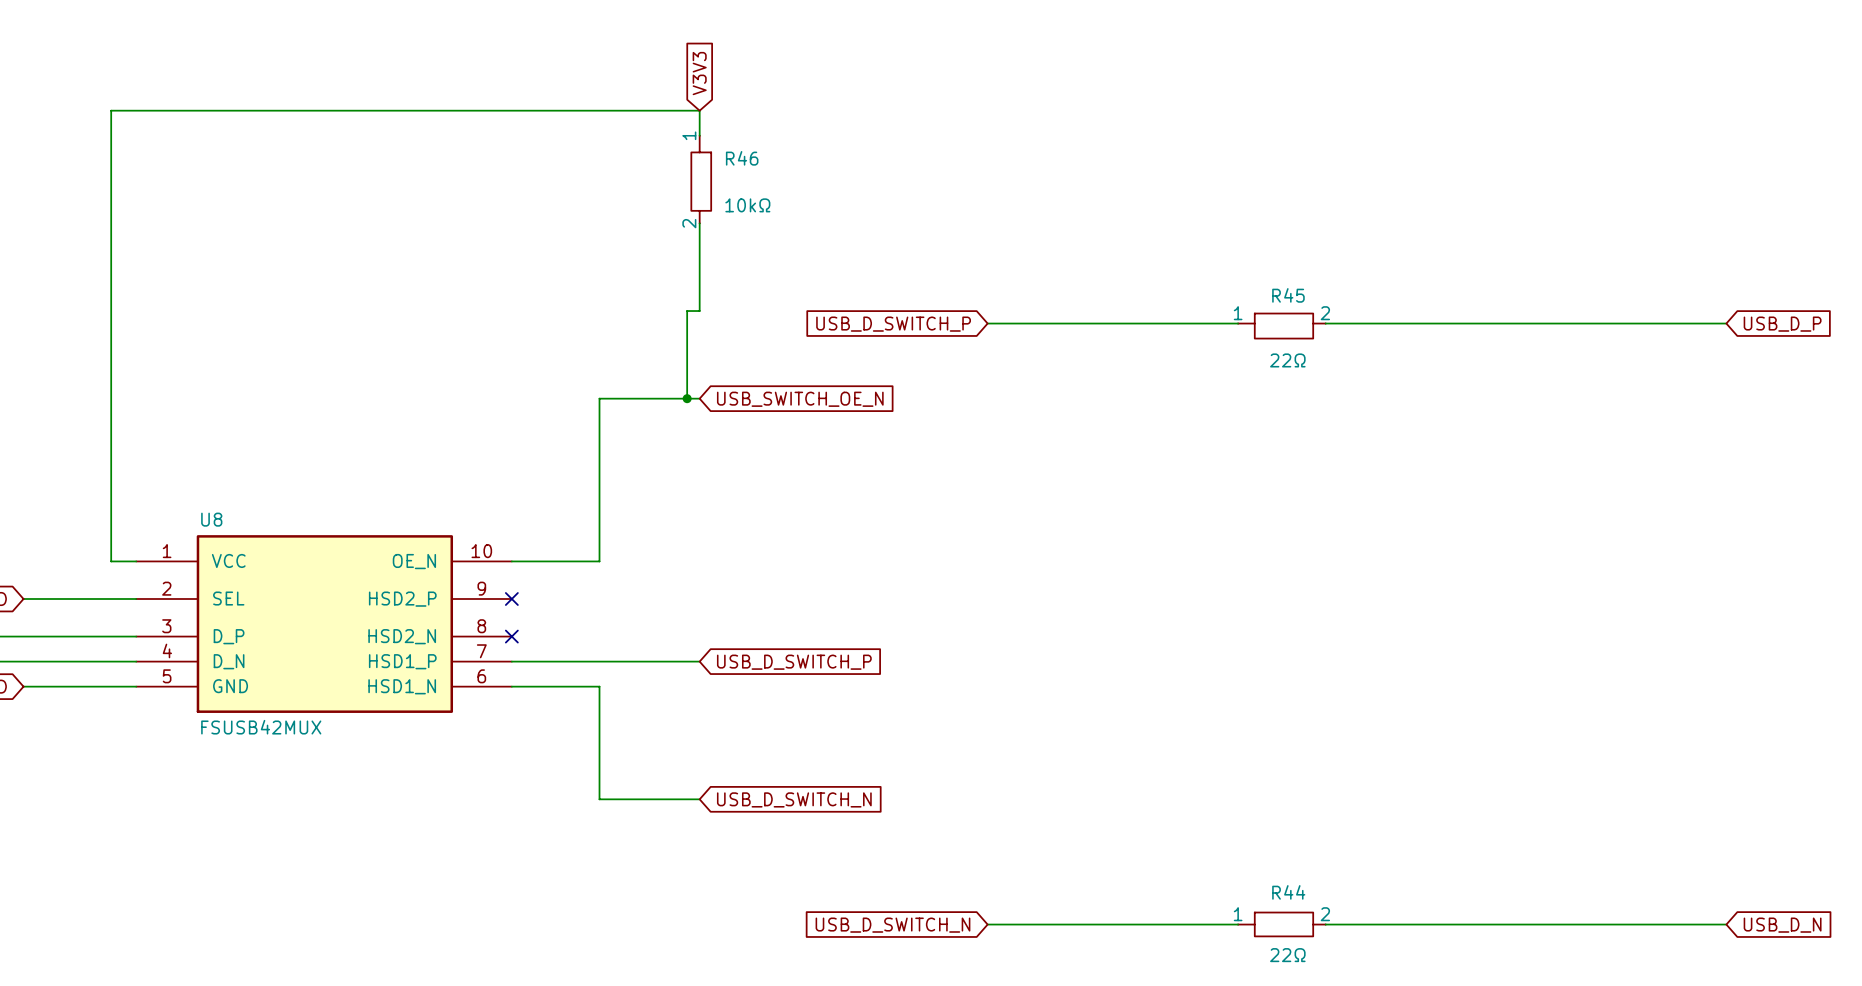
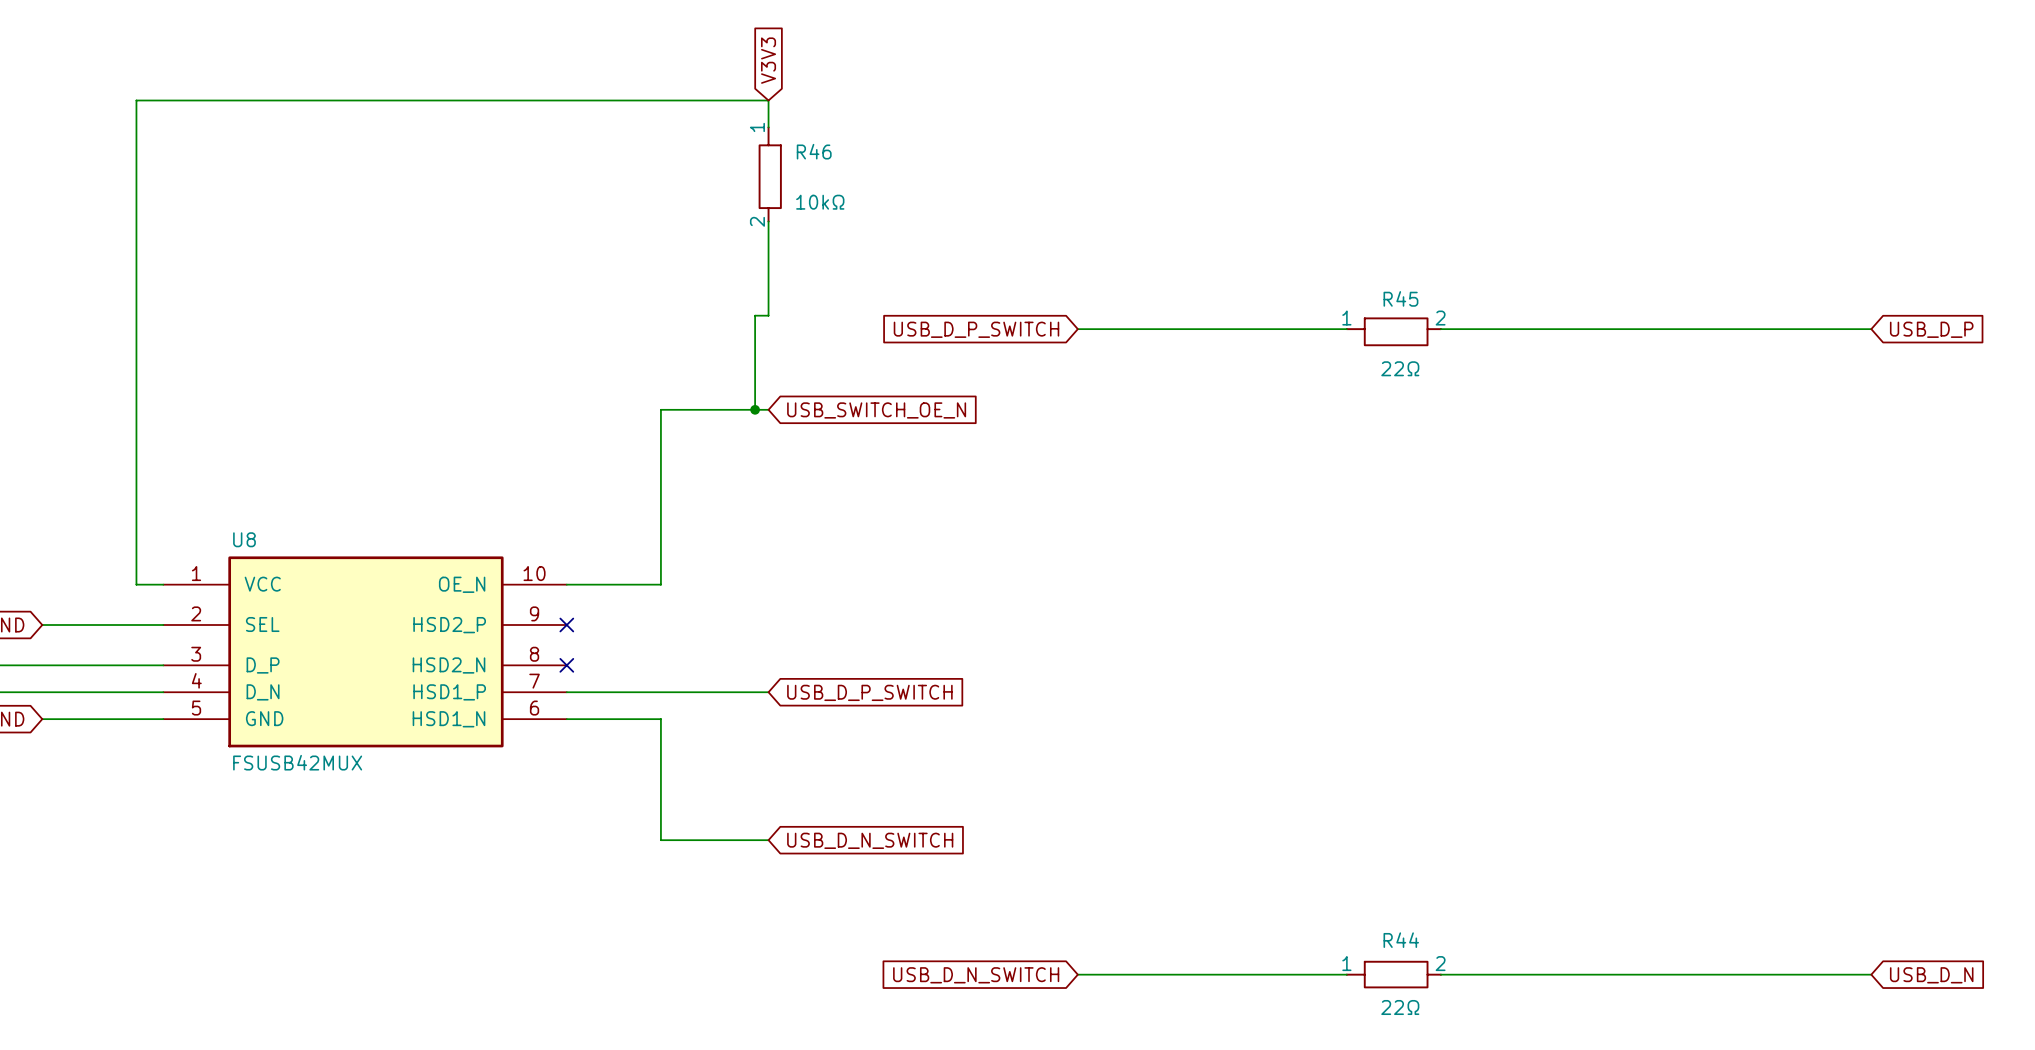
global label: USB_D_SWITCH_P (893, 324) -> USB_D_P_SWITCH (976, 329)
global label: USB_D_SWITCH_P (794, 662) -> USB_D_P_SWITCH (869, 692)
global label: USB_D_SWITCH_N (794, 799) -> USB_D_N_SWITCH (870, 840)
global label: USB_D_SWITCH_N (892, 925) -> USB_D_N_SWITCH (976, 975)

